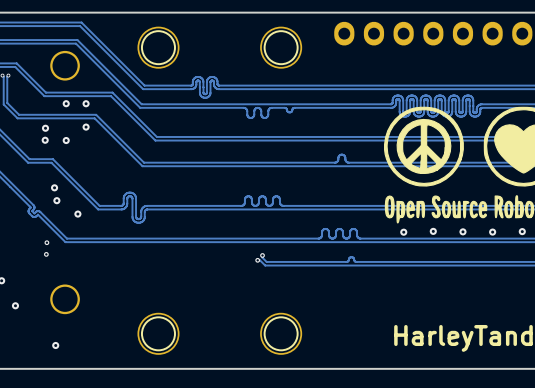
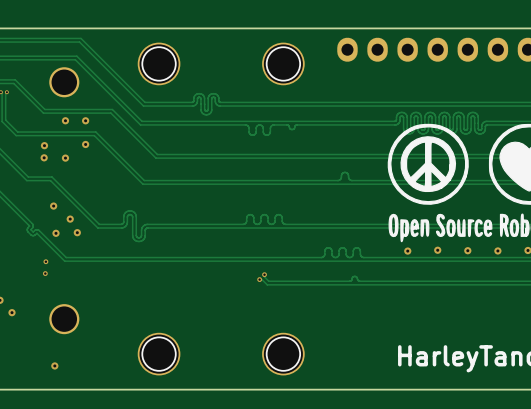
via: (56, 200) -> none
via: none -> (70, 219)
via: none -> (56, 233)
via: none -> (12, 312)
via: (15, 305) -> none

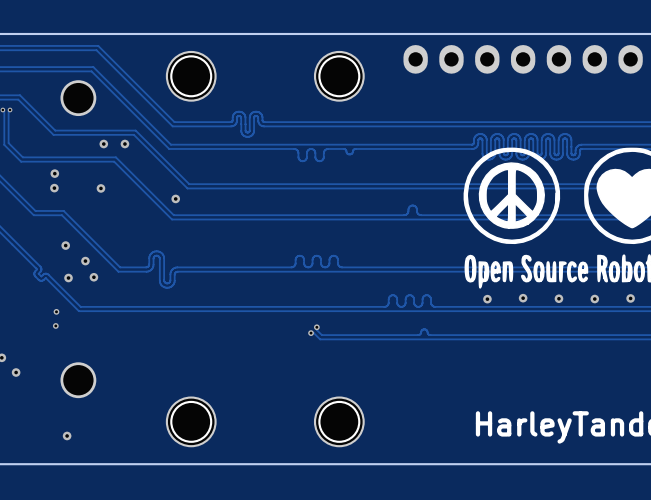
via: (65, 120) -> none
via: none -> (124, 144)
via: (85, 144) -> none
via: (65, 158) -> none
via: none -> (100, 188)
via: none -> (175, 198)

